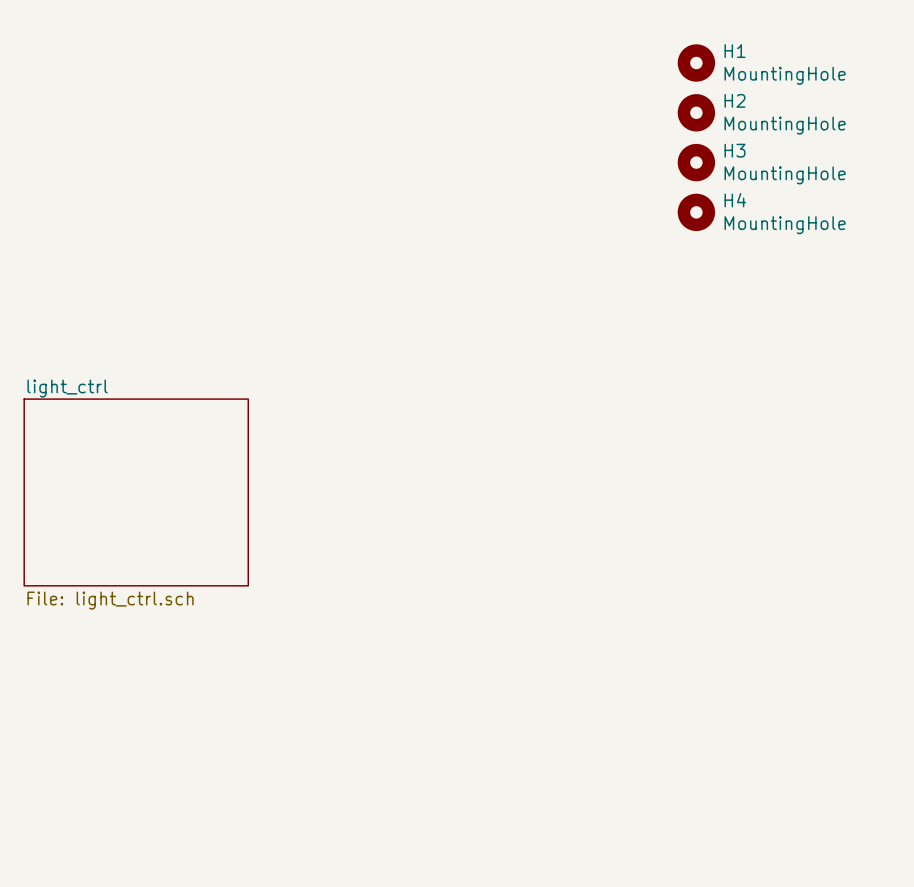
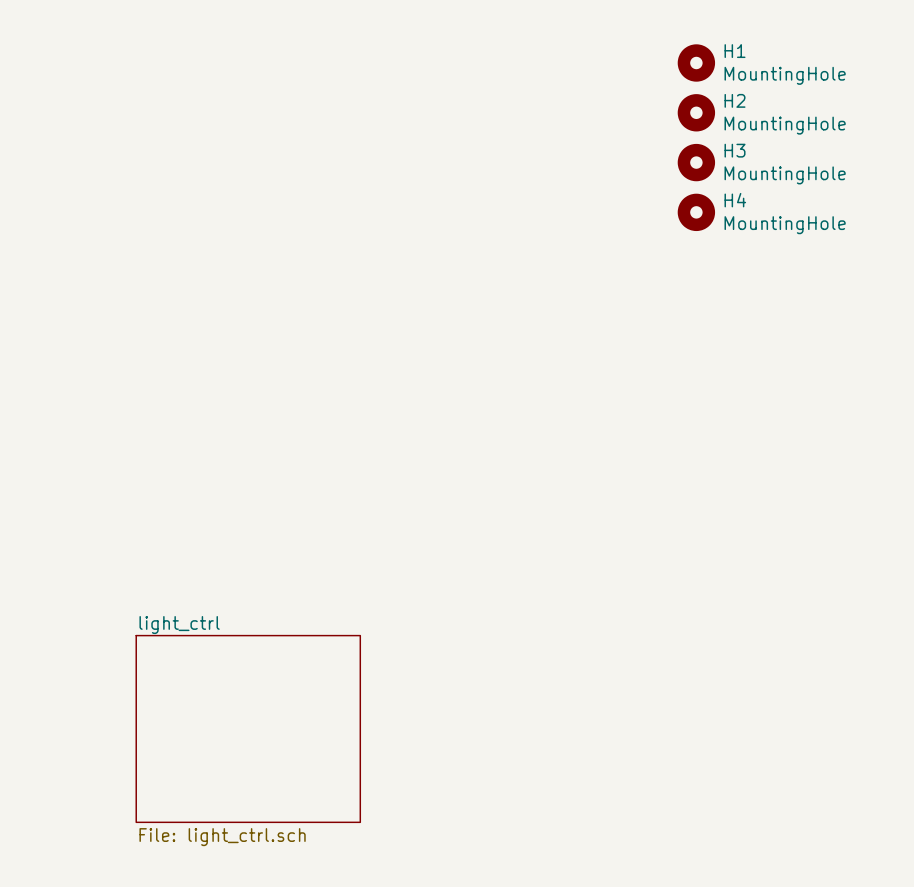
sheet light_ctrl: File: light_ctrl.sch (136, 492) -> none
sheet light_ctrl: none -> File: light_ctrl.sch (248, 728)

